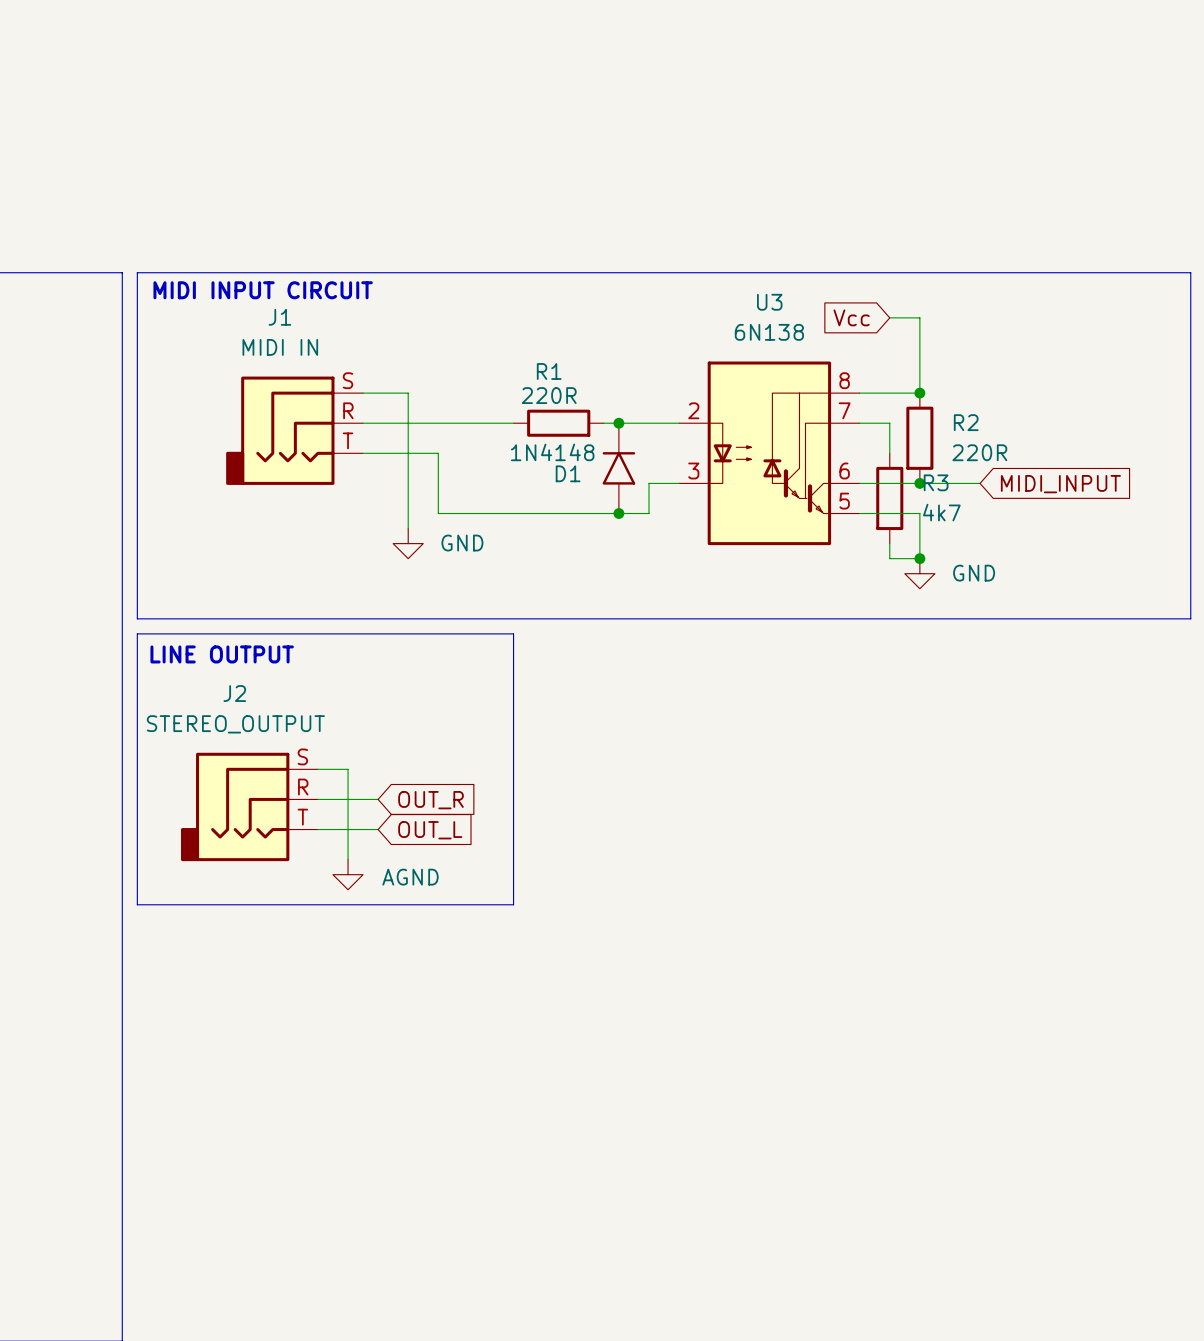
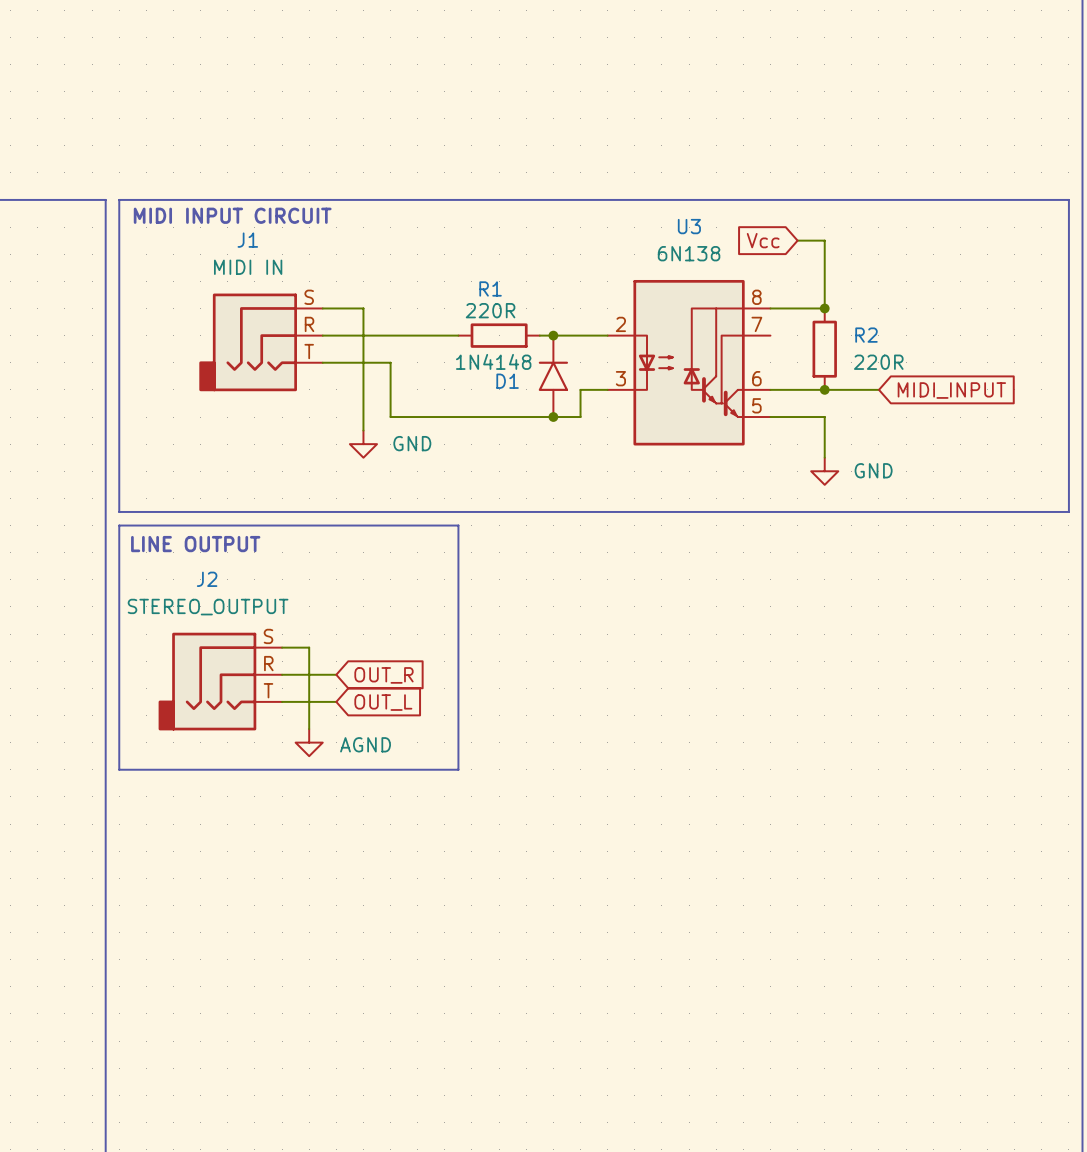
wire: (859, 423) (889, 423) (889, 453) -> none
R3: 4k7 (889, 498) -> none
wire: (889, 543) (889, 558) (919, 558) -> none
junction: (919, 558) -> none

